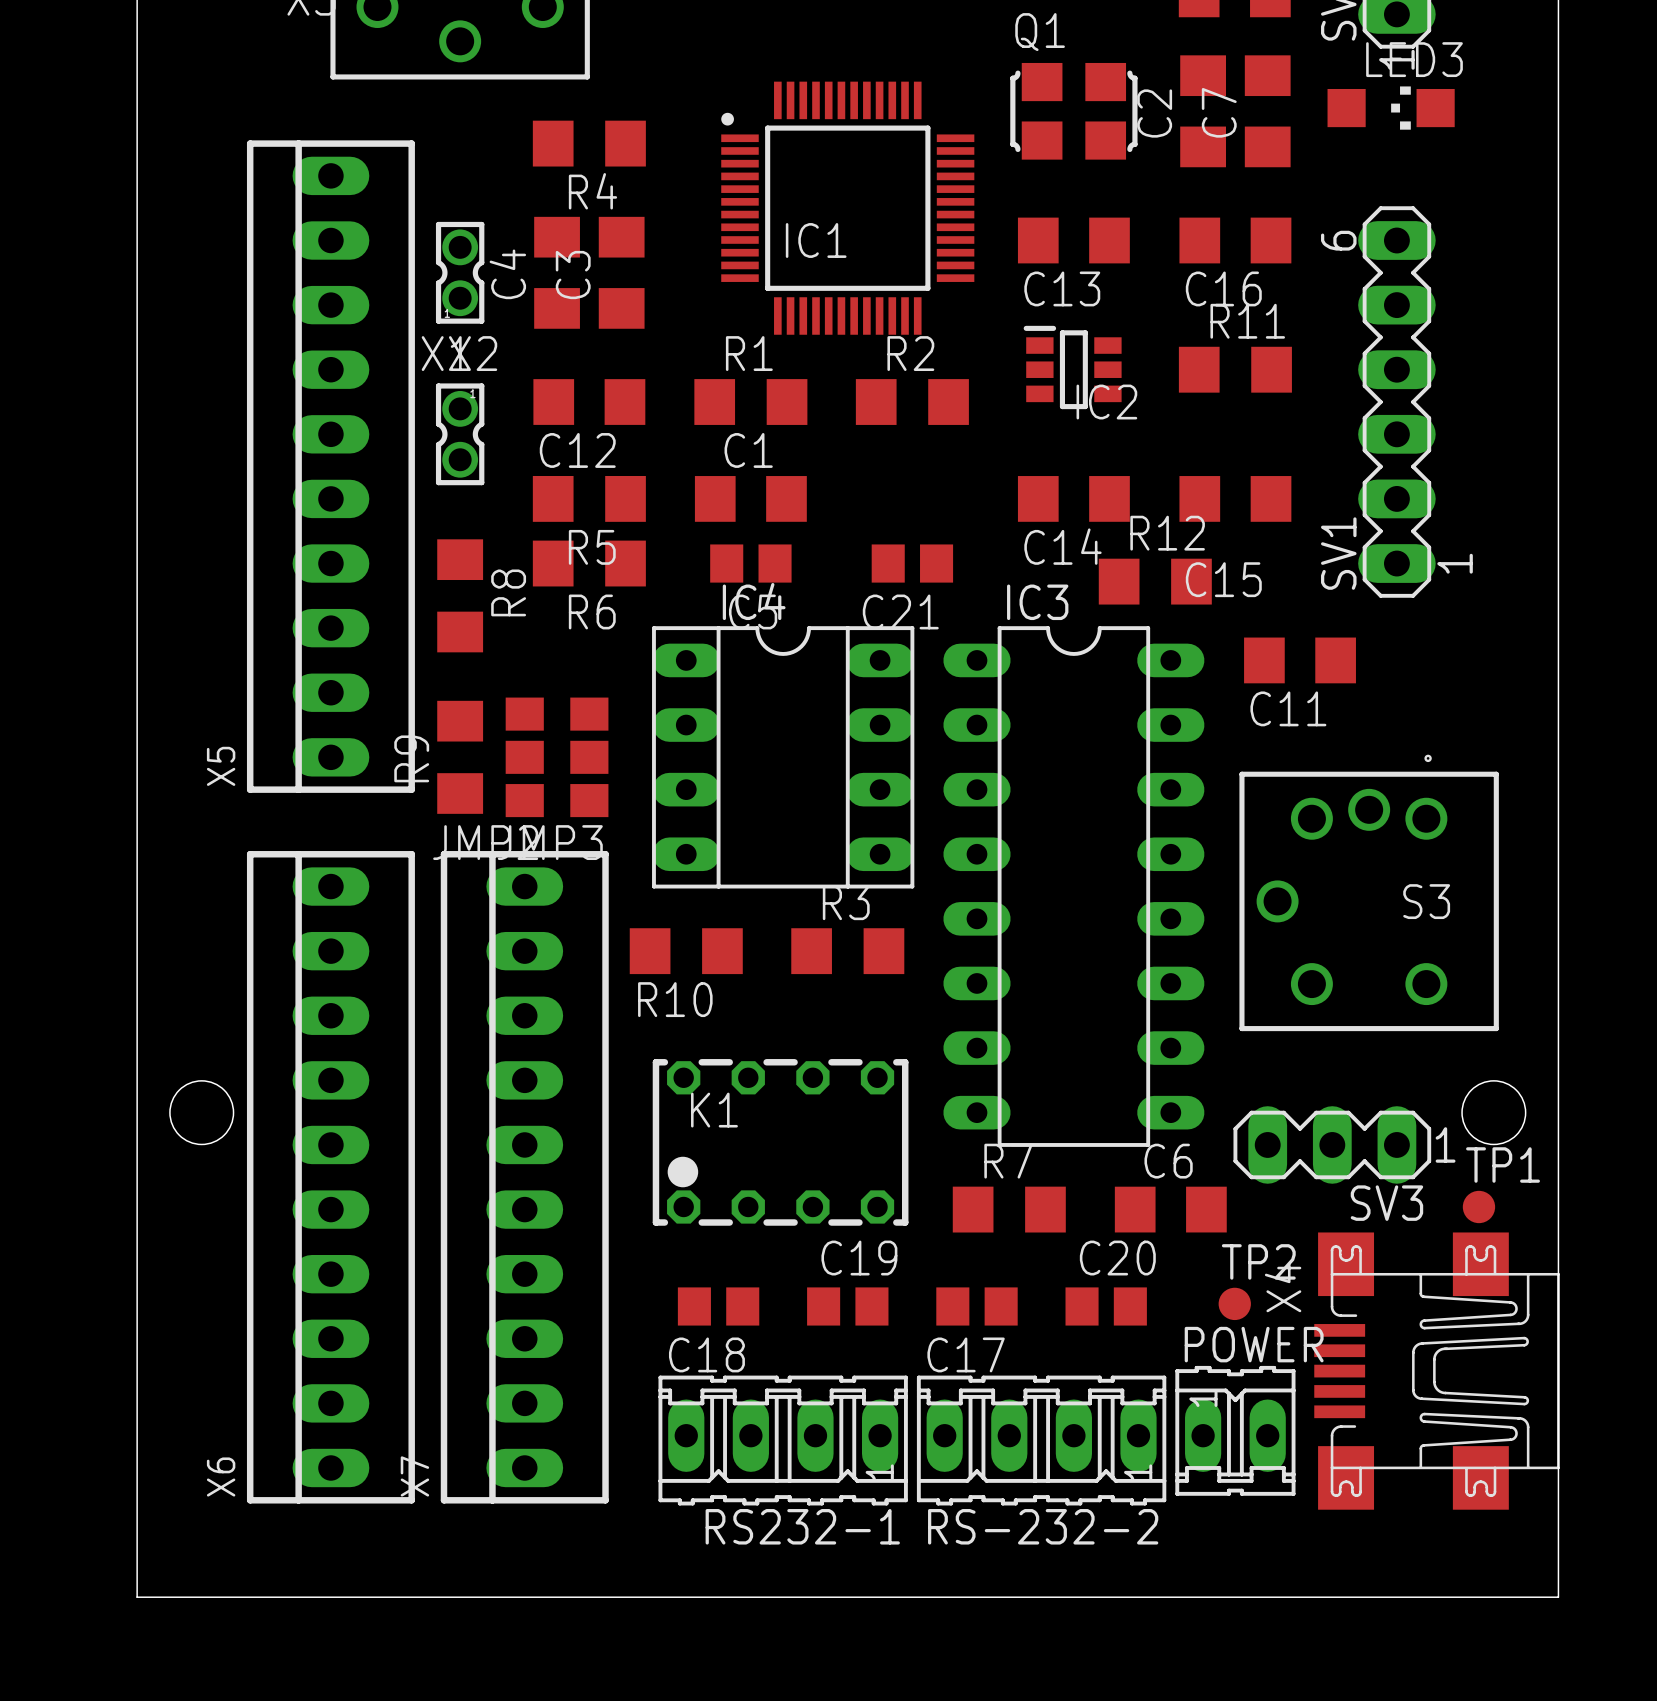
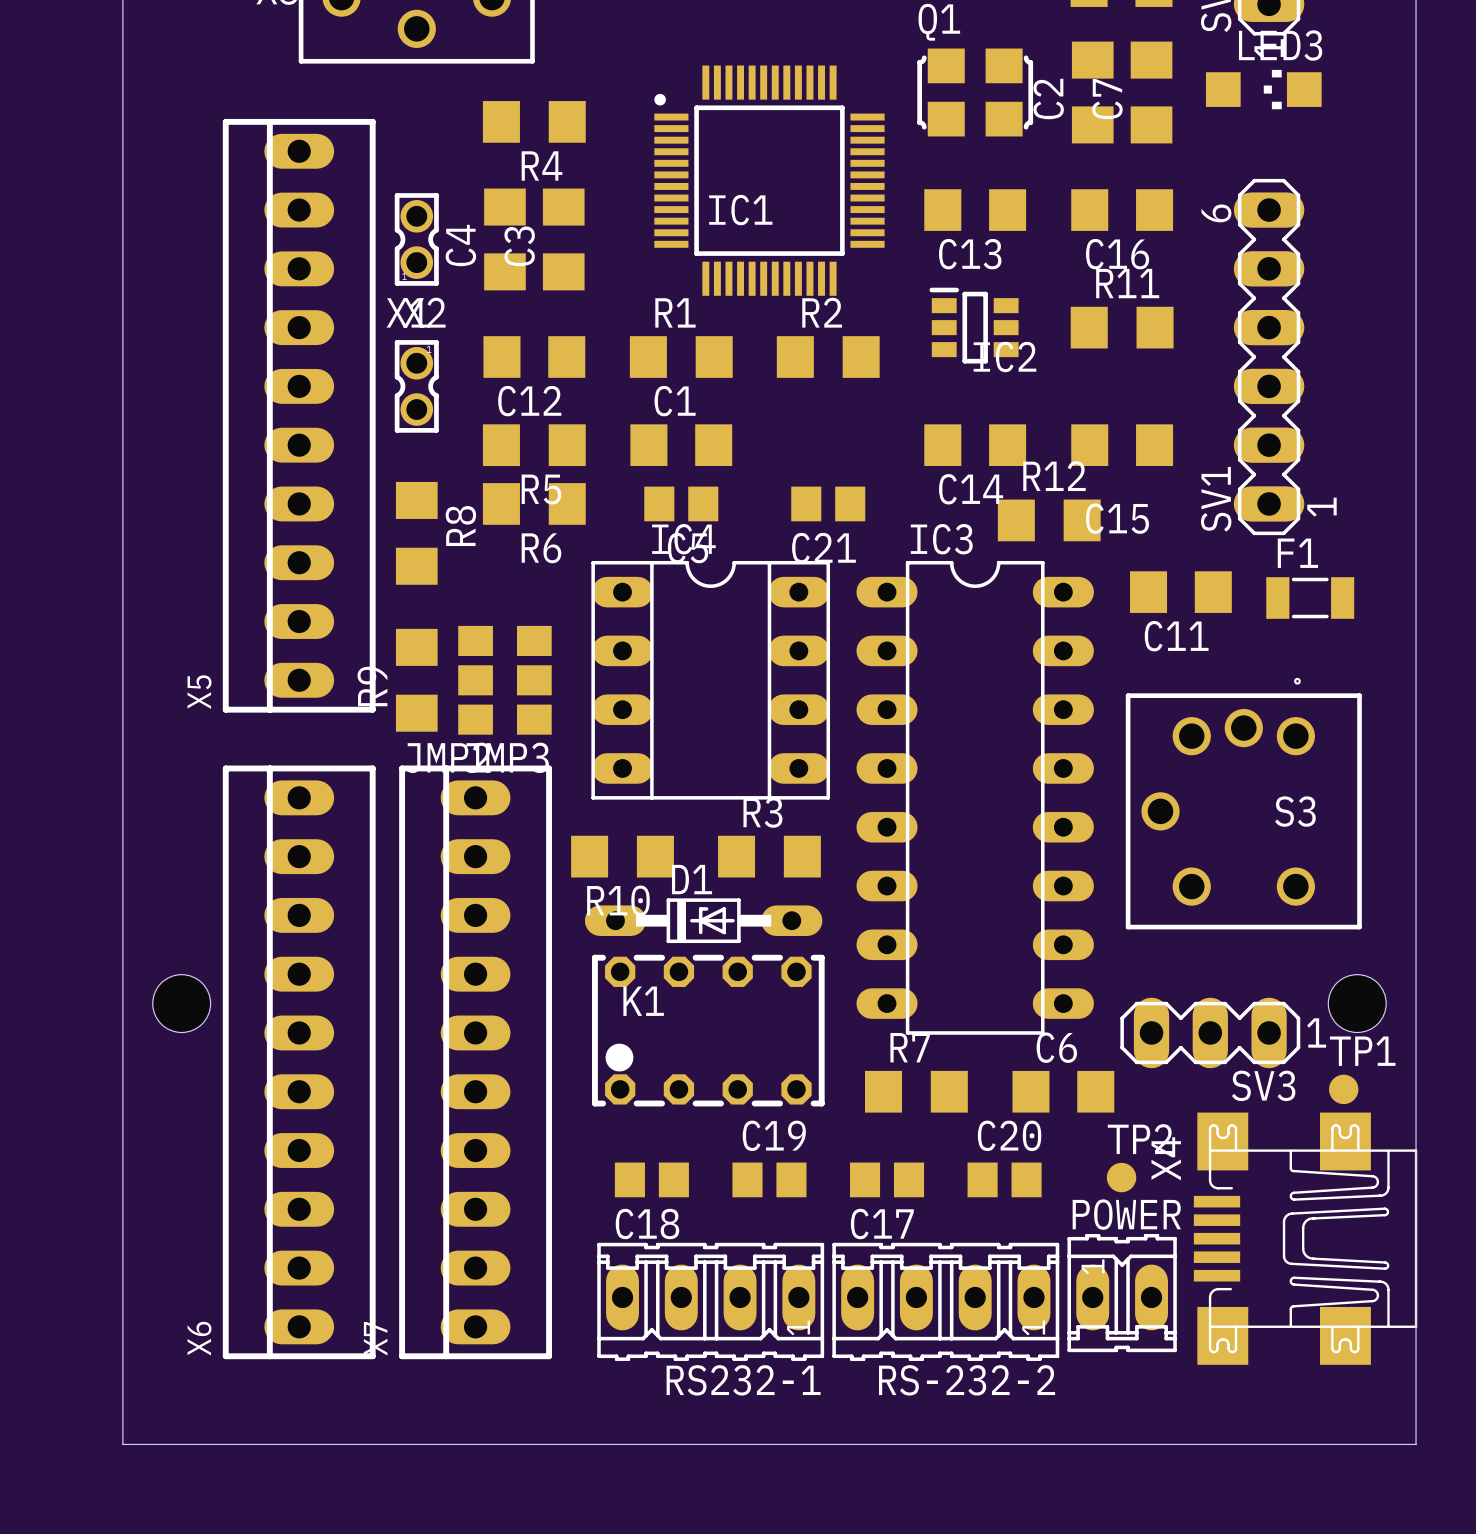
F1: none -> (1310, 598)
D1: none -> (703, 920)

